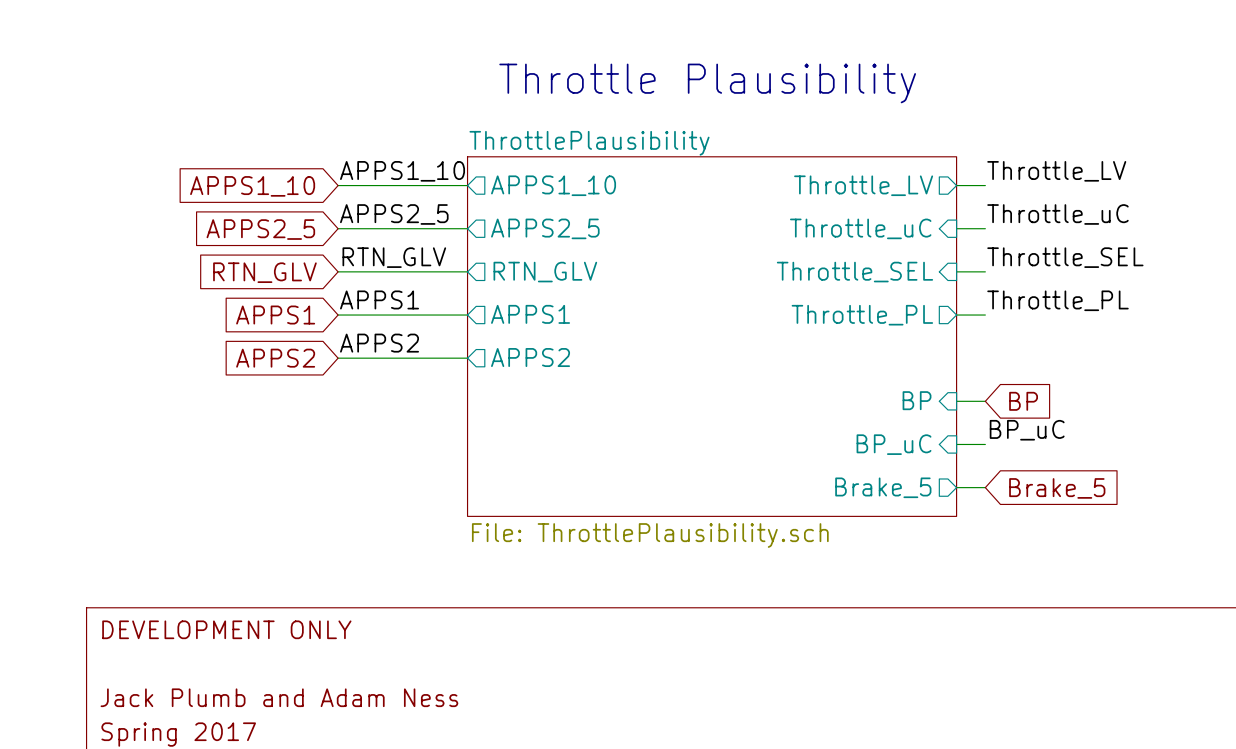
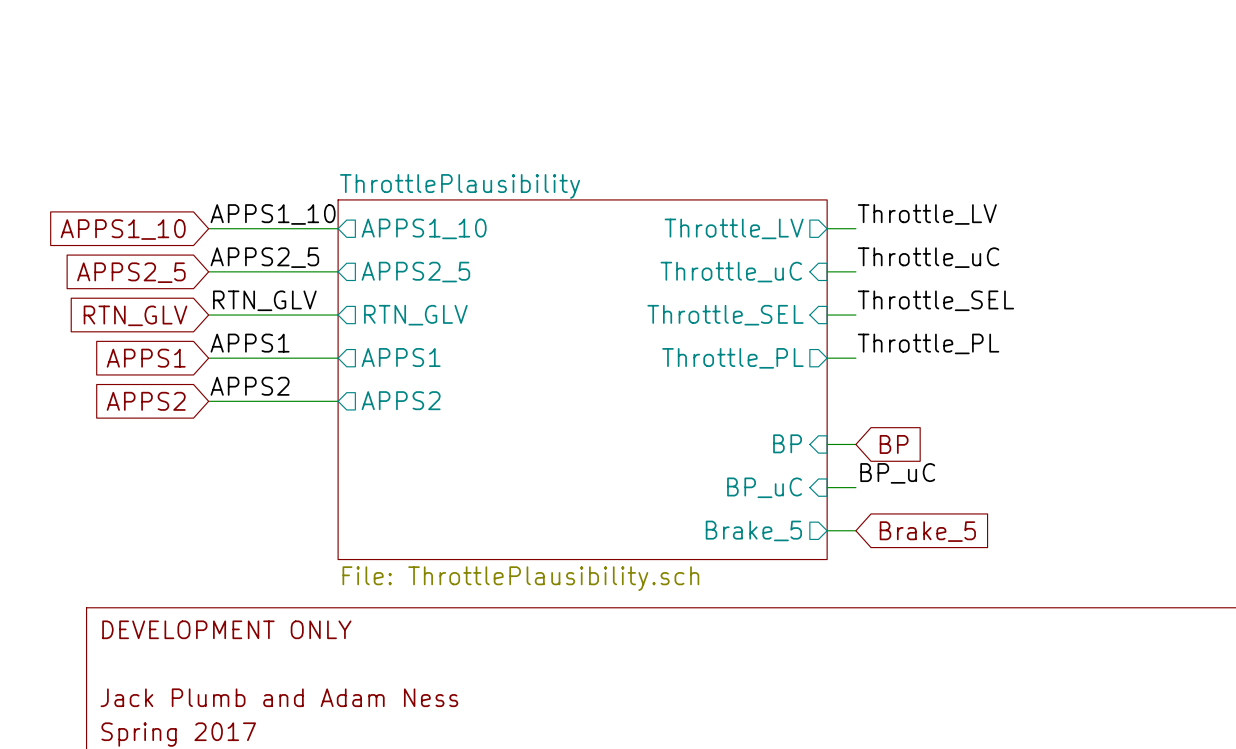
text: Throttle Plausibility (707, 83) -> none
label position: APPS1_10 (402, 171) -> APPS1_10 (273, 214)
label position: Throttle_LV (1056, 171) -> Throttle_LV (927, 214)
wire: (338, 185) (467, 185) -> (208, 401) (338, 401)
sheet pin position: APPS1_10 (553, 185) -> APPS1_10 (424, 228)
sheet pin position: Throttle_LV (863, 185) -> Throttle_LV (734, 228)
wire: (956, 185) (985, 185) -> (827, 228) (855, 228)
global label position: APPS1_10 (252, 186) -> APPS1_10 (123, 229)
label position: APPS2_5 (394, 214) -> APPS2_5 (264, 257)
label position: Throttle_uC (1057, 214) -> Throttle_uC (928, 257)
wire: (338, 228) (467, 228) -> (338, 228) (208, 228)
sheet pin position: APPS2_5 (545, 228) -> APPS2_5 (415, 272)
sheet pin position: Throttle_uC (860, 228) -> Throttle_uC (731, 272)
wire: (956, 228) (985, 228) -> (827, 271) (855, 271)
global label position: APPS2_5 (260, 229) -> APPS2_5 (131, 272)
label position: RTN_GLV (394, 257) -> RTN_GLV (264, 300)
label position: Throttle_SEL (1065, 257) -> Throttle_SEL (935, 300)
wire: (338, 271) (467, 271) -> (338, 271) (208, 271)
wire: (956, 271) (985, 271) -> (827, 315) (855, 315)
global label position: RTN_GLV (264, 272) -> RTN_GLV (135, 315)
sheet pin position: RTN_GLV (545, 272) -> RTN_GLV (415, 315)
sheet pin position: Throttle_SEL (854, 272) -> Throttle_SEL (725, 315)
label position: APPS1 (379, 299) -> APPS1 (250, 343)
label position: Throttle_PL (1057, 300) -> Throttle_PL (928, 343)
sheet pin position: APPS1 (530, 314) -> APPS1 (401, 357)
global label position: APPS1 (275, 315) -> APPS1 (146, 358)
wire: (338, 315) (467, 315) -> (338, 315) (208, 315)
sheet pin position: Throttle_PL (862, 315) -> Throttle_PL (732, 358)
wire: (956, 315) (985, 315) -> (827, 358) (855, 358)
sheet ThrottlePlausibility position: (712, 336) -> (582, 379)
label position: APPS2 (379, 343) -> APPS2 (250, 386)
sheet pin position: APPS2 (530, 357) -> APPS2 (401, 400)
global label position: APPS2 (275, 358) -> APPS2 (146, 401)
wire: (338, 358) (467, 358) -> (338, 358) (208, 358)
sheet pin position: BP (917, 400) -> BP (787, 443)
wire: (956, 401) (985, 401) -> (827, 444) (855, 444)
global label position: BP (1023, 401) -> BP (894, 444)
label position: BP_uC (1027, 430) -> BP_uC (897, 473)
sheet pin position: BP_uC (894, 444) -> BP_uC (764, 487)
wire: (956, 444) (985, 444) -> (827, 487) (855, 487)
sheet pin position: Brake_5 (883, 487) -> Brake_5 (753, 530)
wire: (956, 487) (985, 487) -> (827, 530) (855, 530)
global label position: Brake_5 (1057, 488) -> Brake_5 (927, 531)

